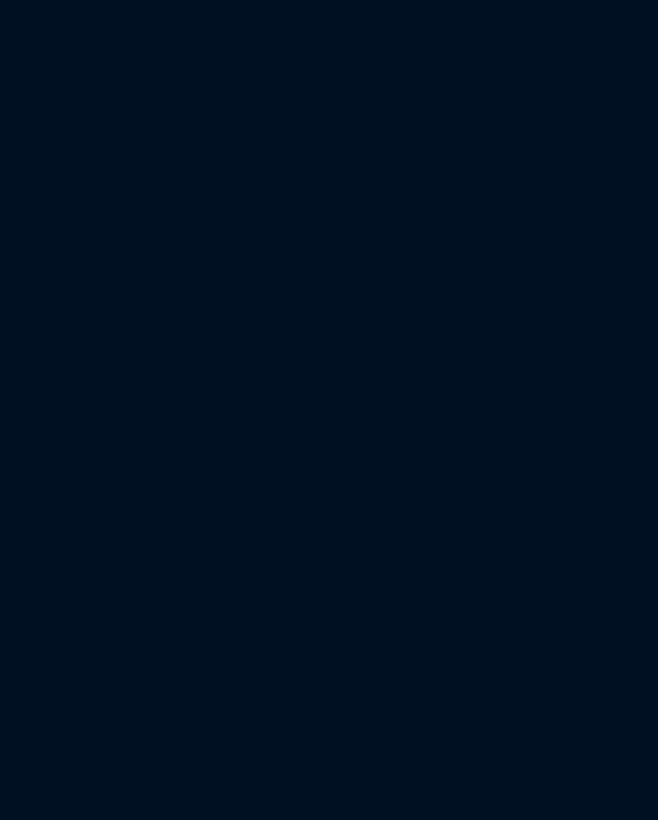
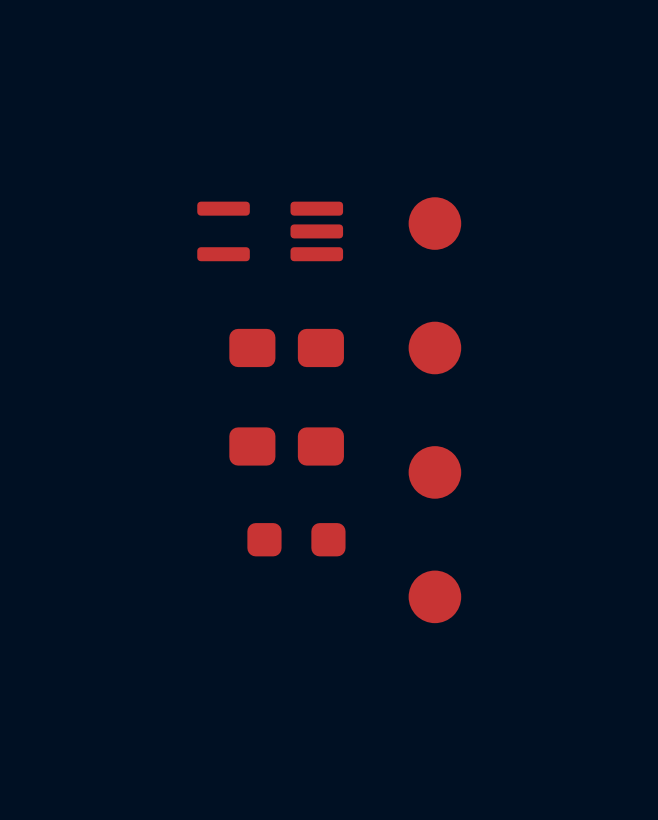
part: none -> (434, 223)
part: none -> (270, 231)
part: none -> (286, 347)
part: none -> (434, 347)
part: none -> (286, 446)
part: none -> (434, 472)
part: none -> (296, 539)
part: none -> (434, 596)

